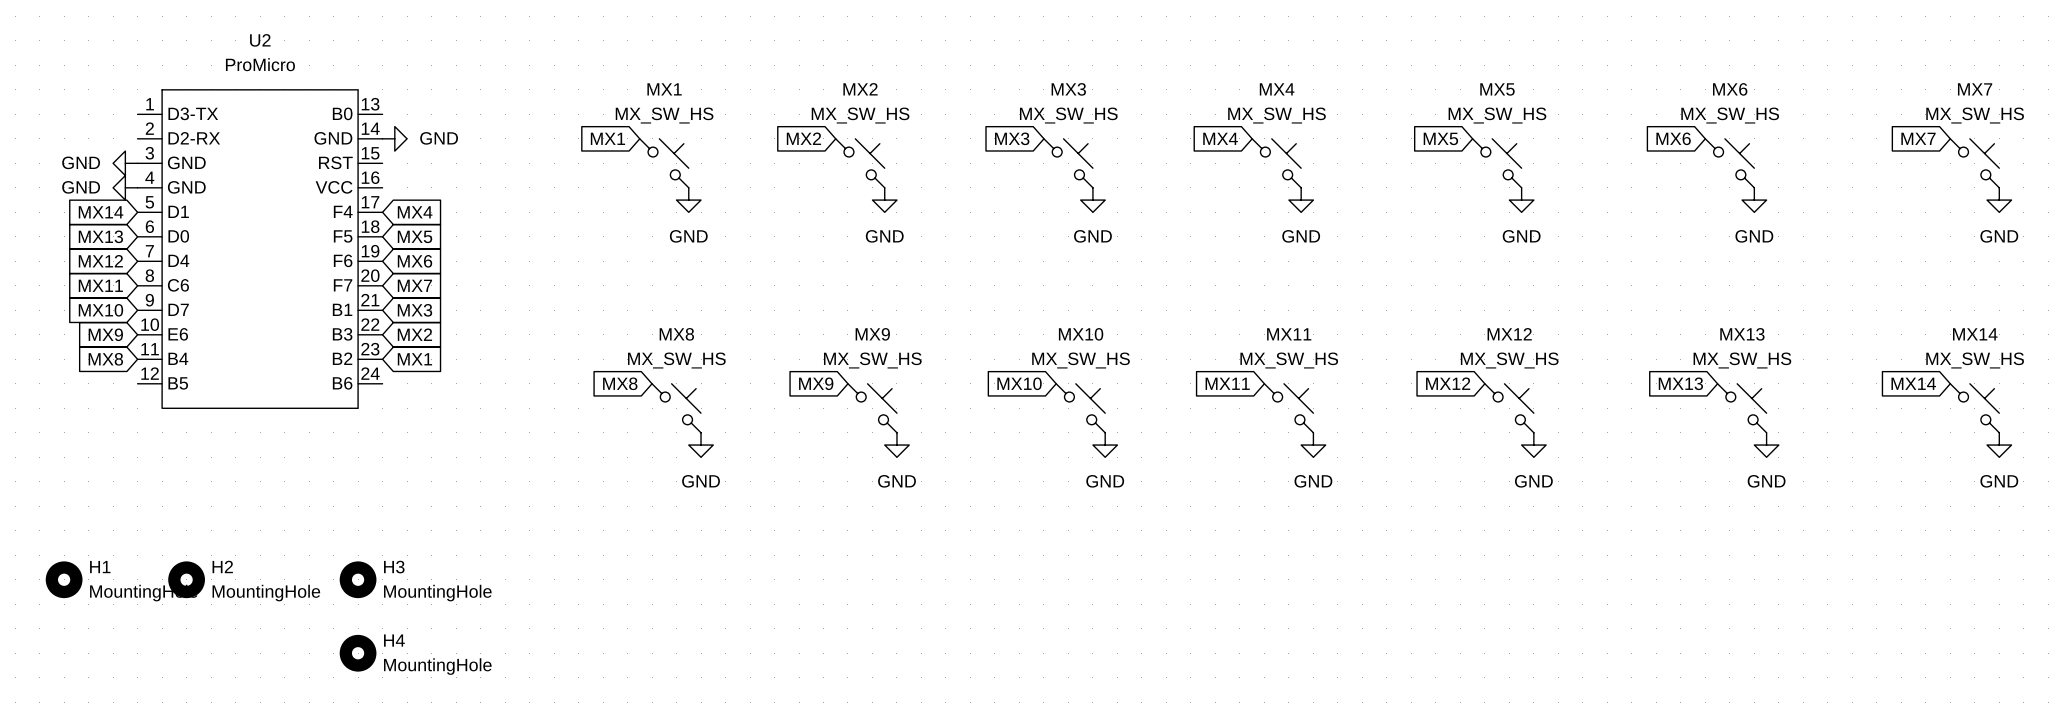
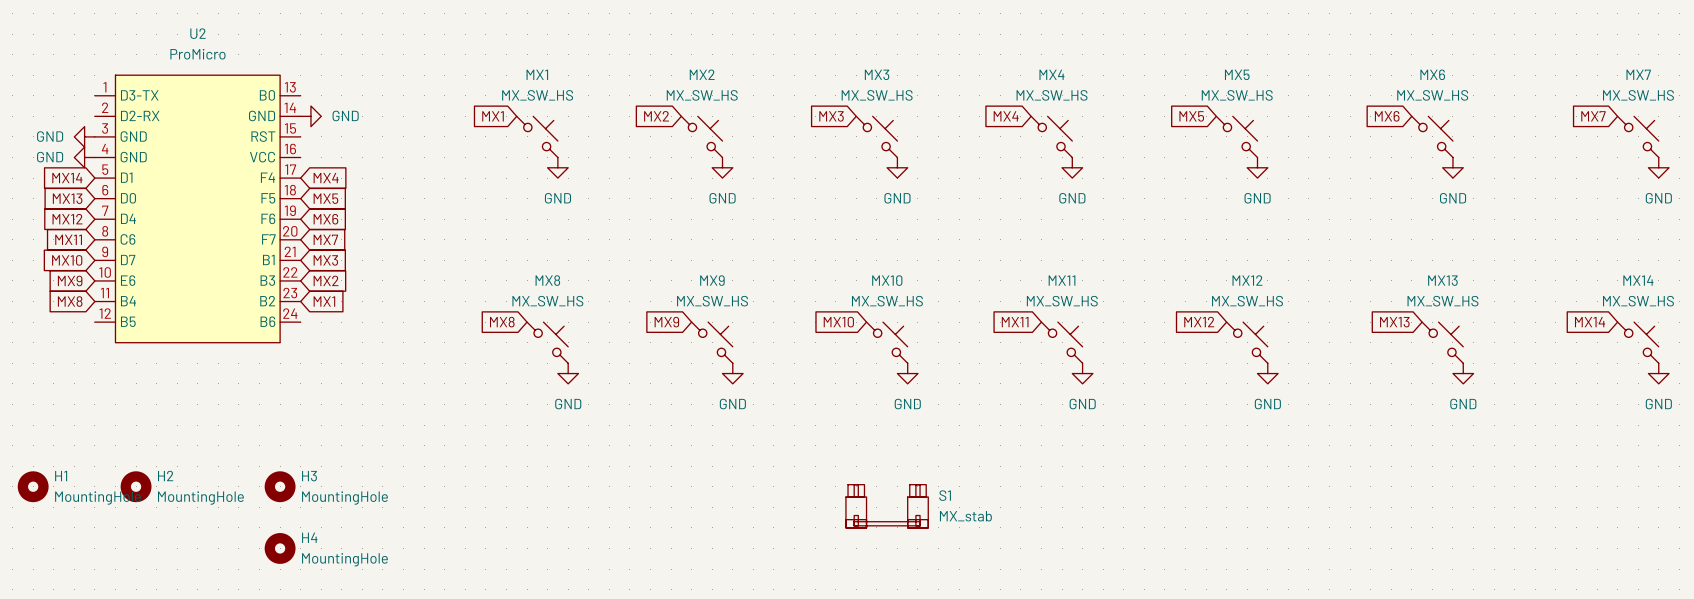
S1: none -> MX_stab (887, 506)

